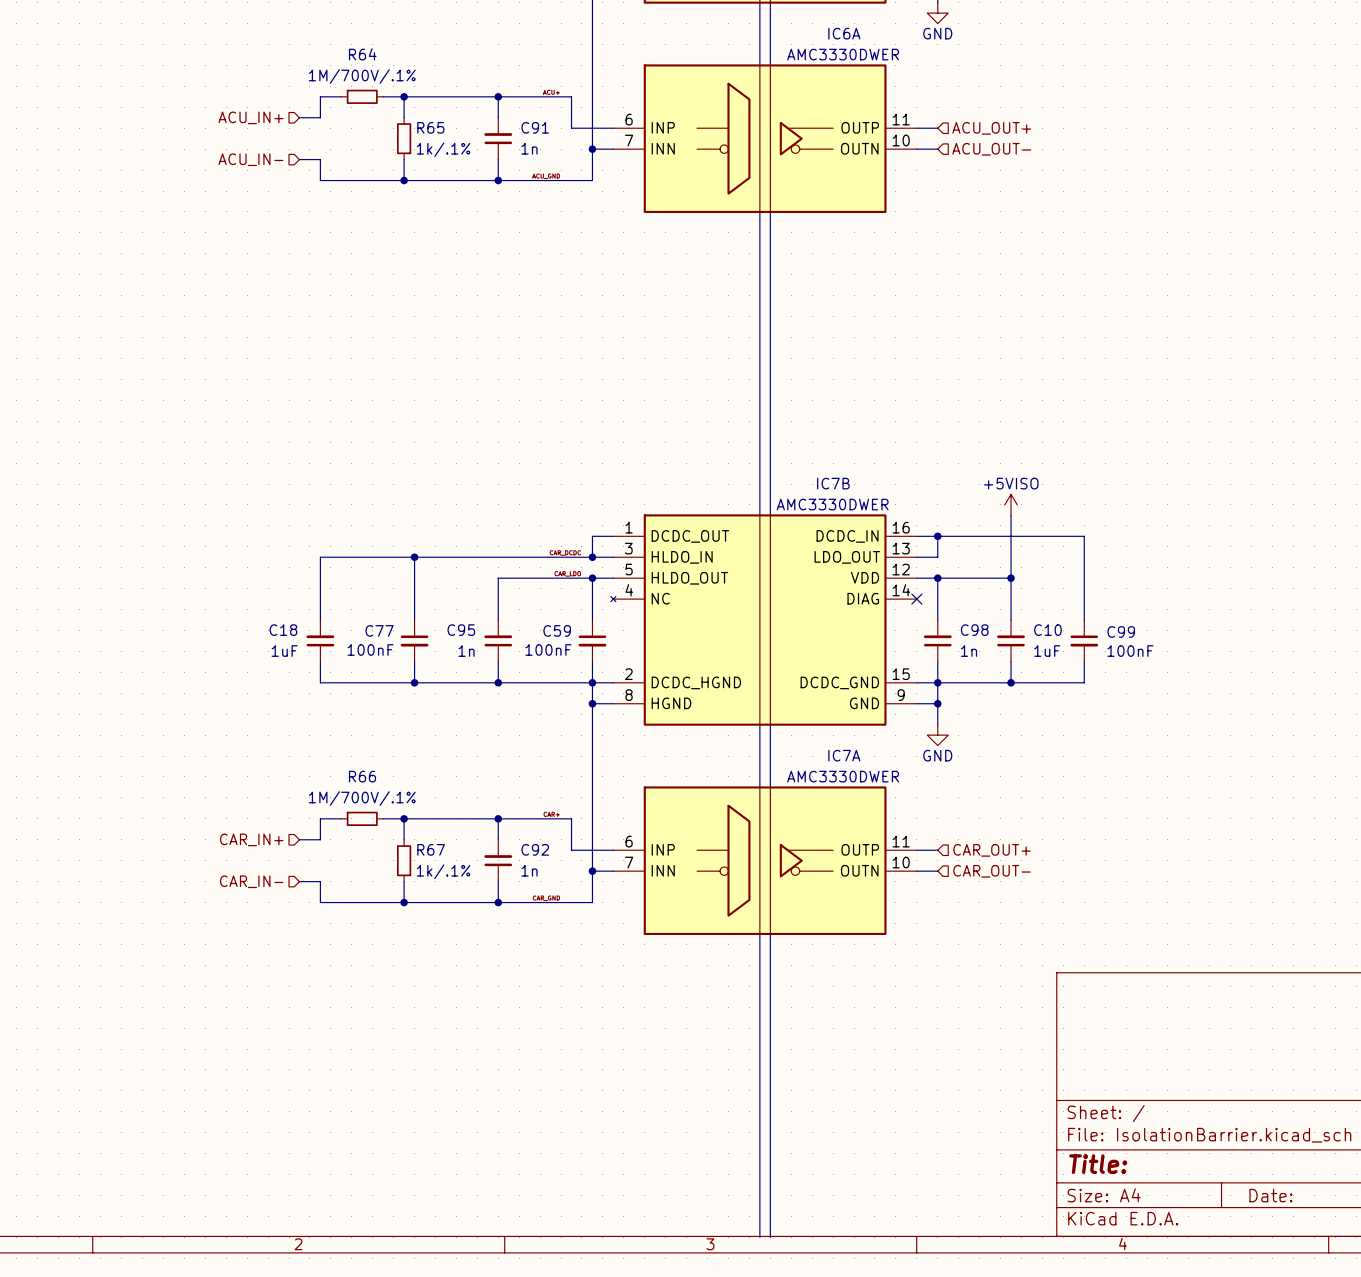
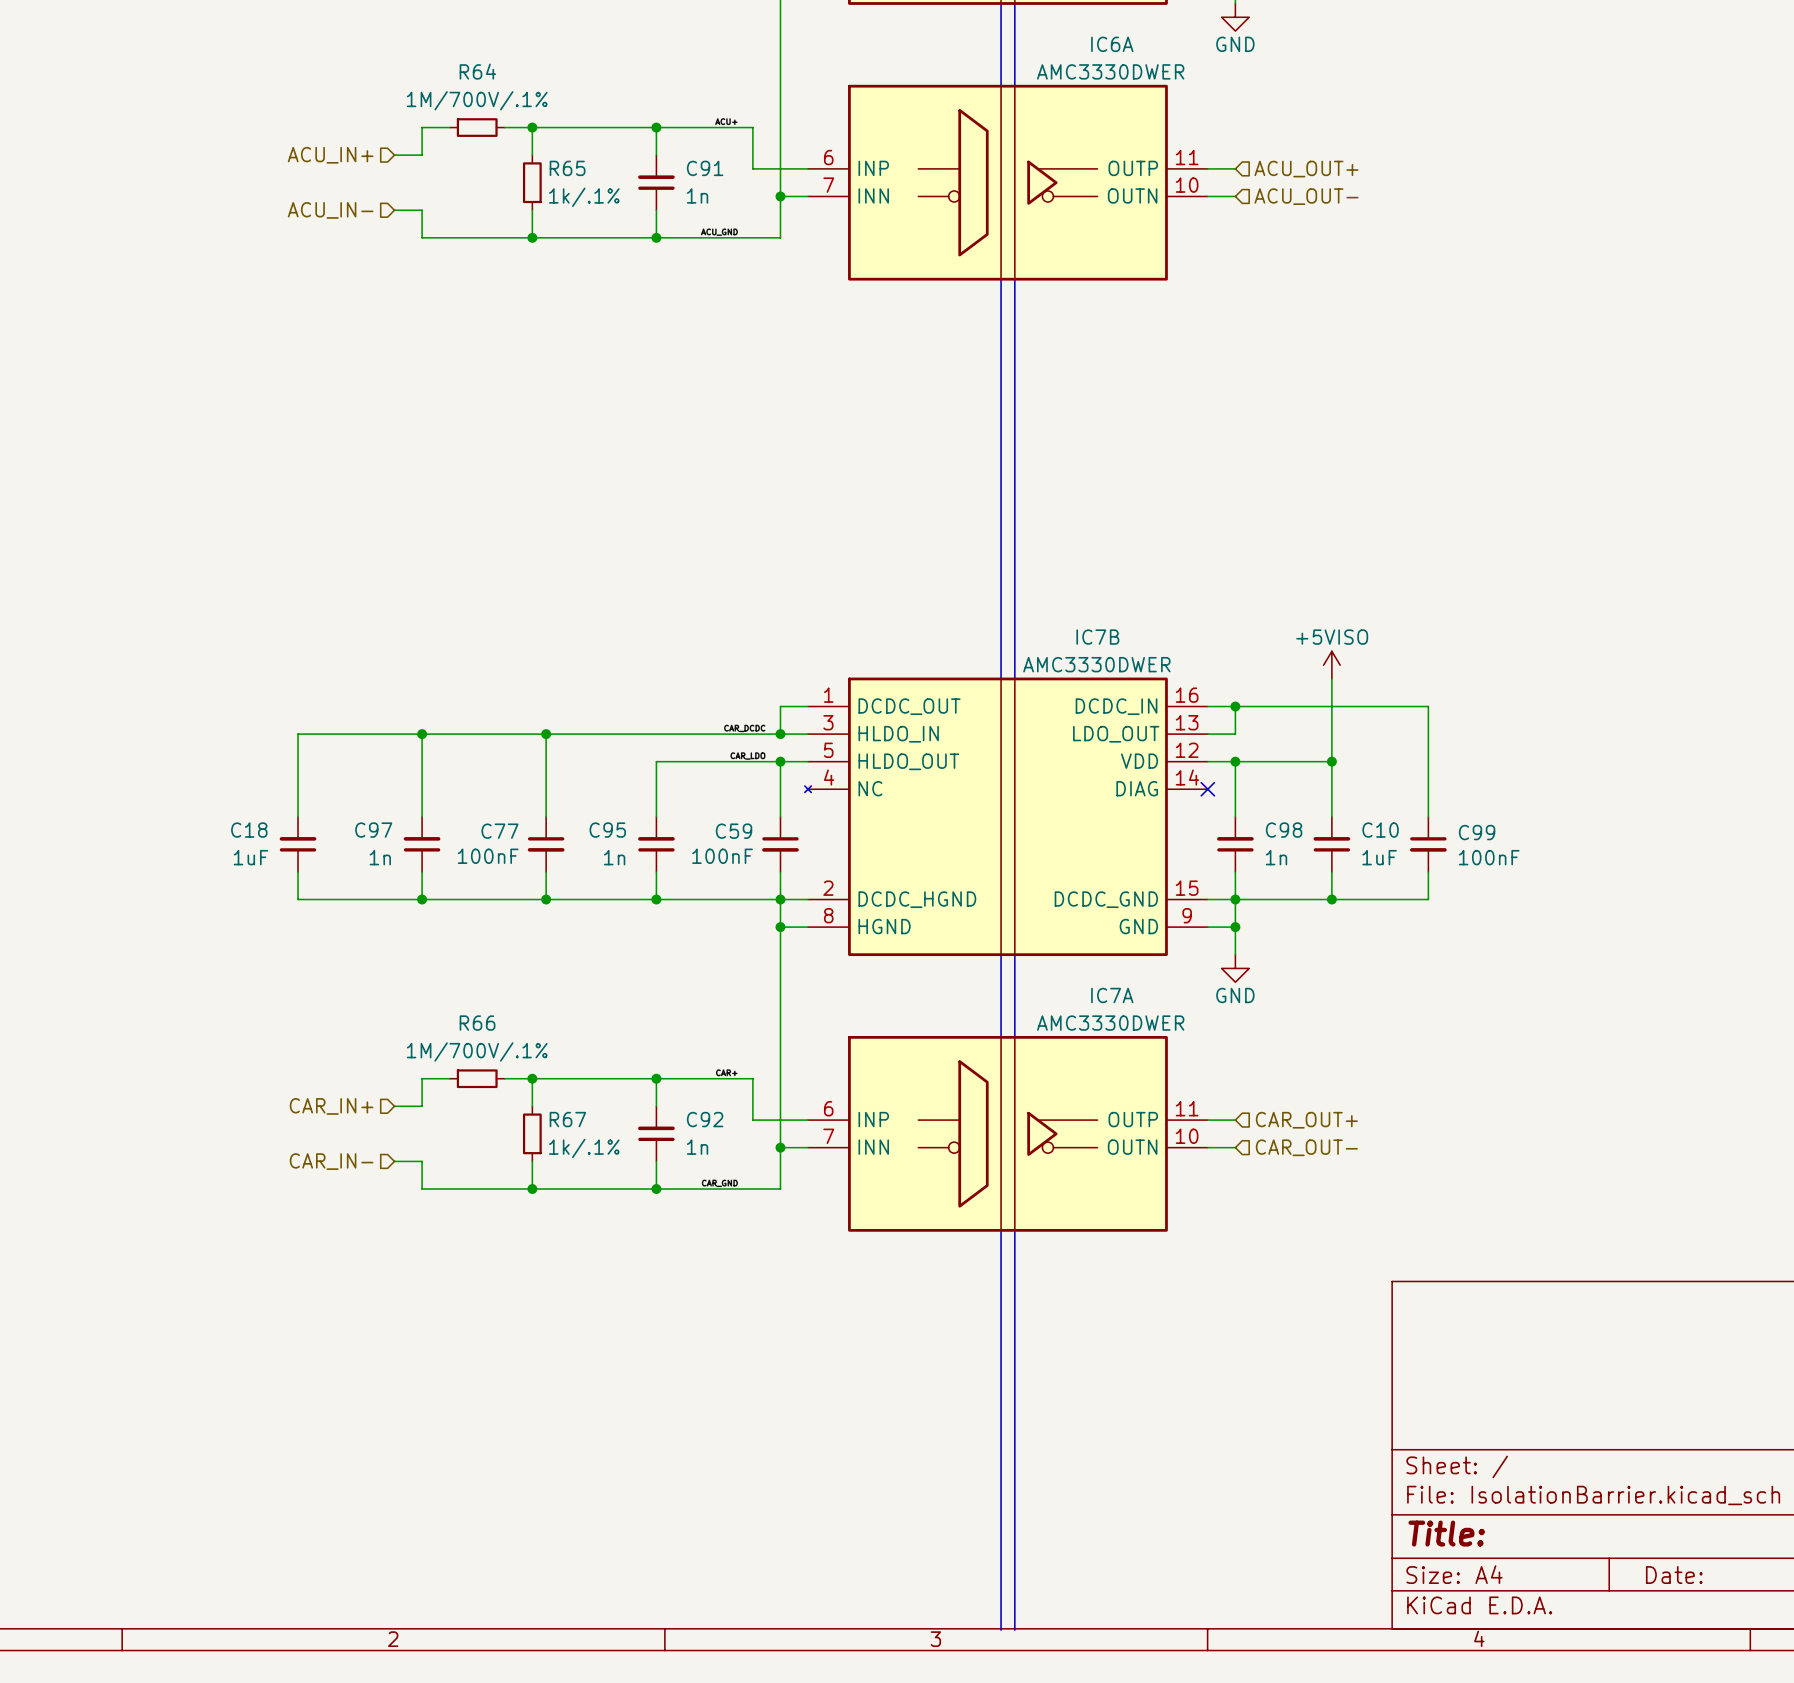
wire: none -> (422, 734) (298, 734) (298, 816)
junction: none -> (422, 734)
C18 name: C18 (283, 630) -> C97 (373, 830)
C18: none -> 1uF (298, 844)
C18 value: 1uF (284, 651) -> 1n (380, 857)
wire: none -> (298, 871) (298, 899) (422, 899)
junction: none -> (422, 899)

